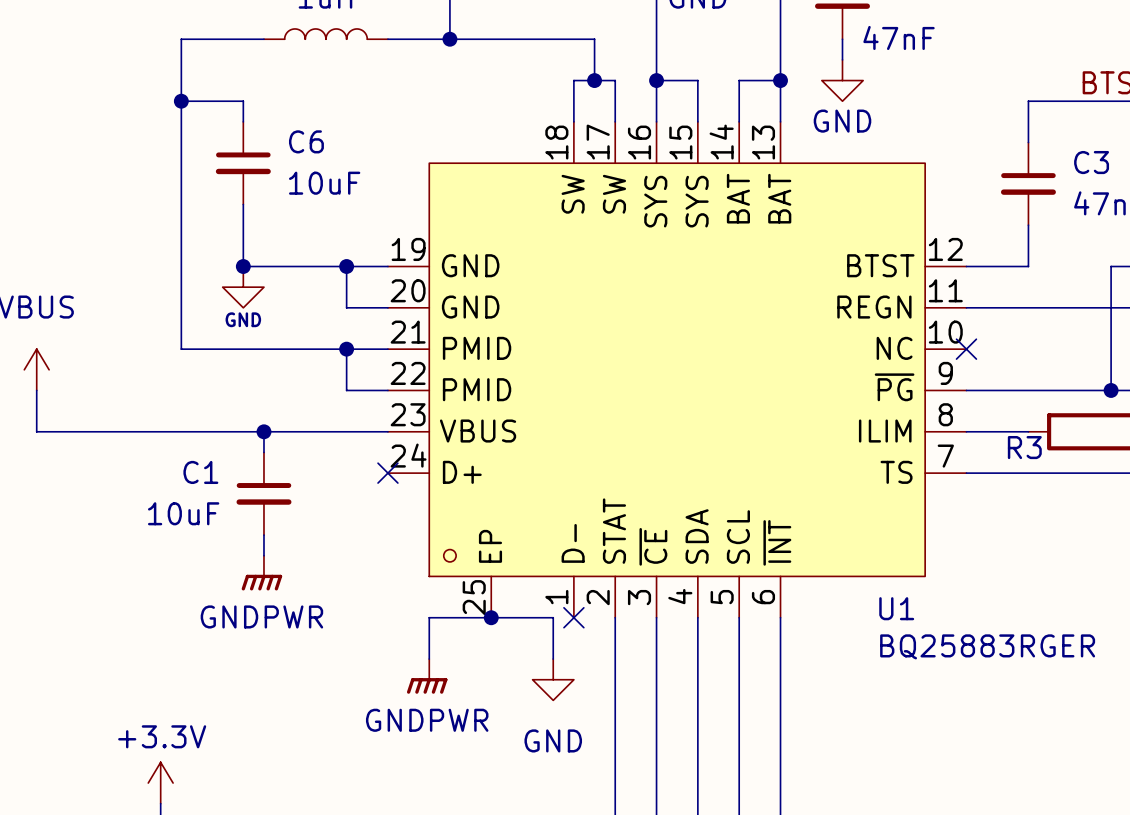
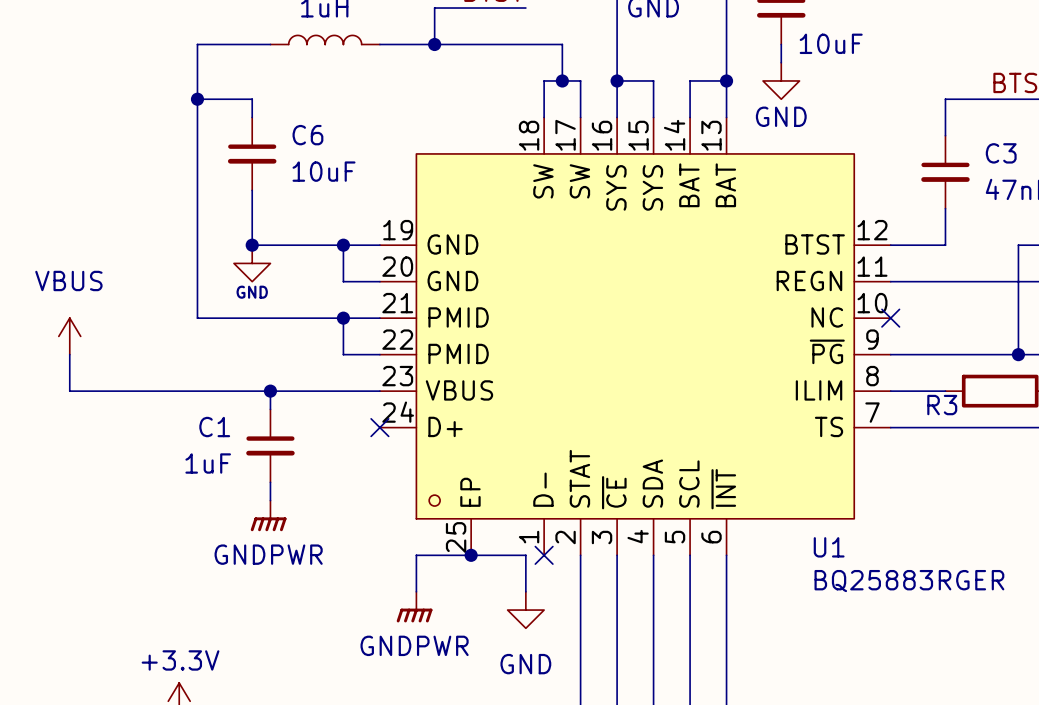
part value: 47nF (899, 37) -> 10uF (831, 43)
C1 value: 10uF (183, 513) -> 1uF (208, 463)

